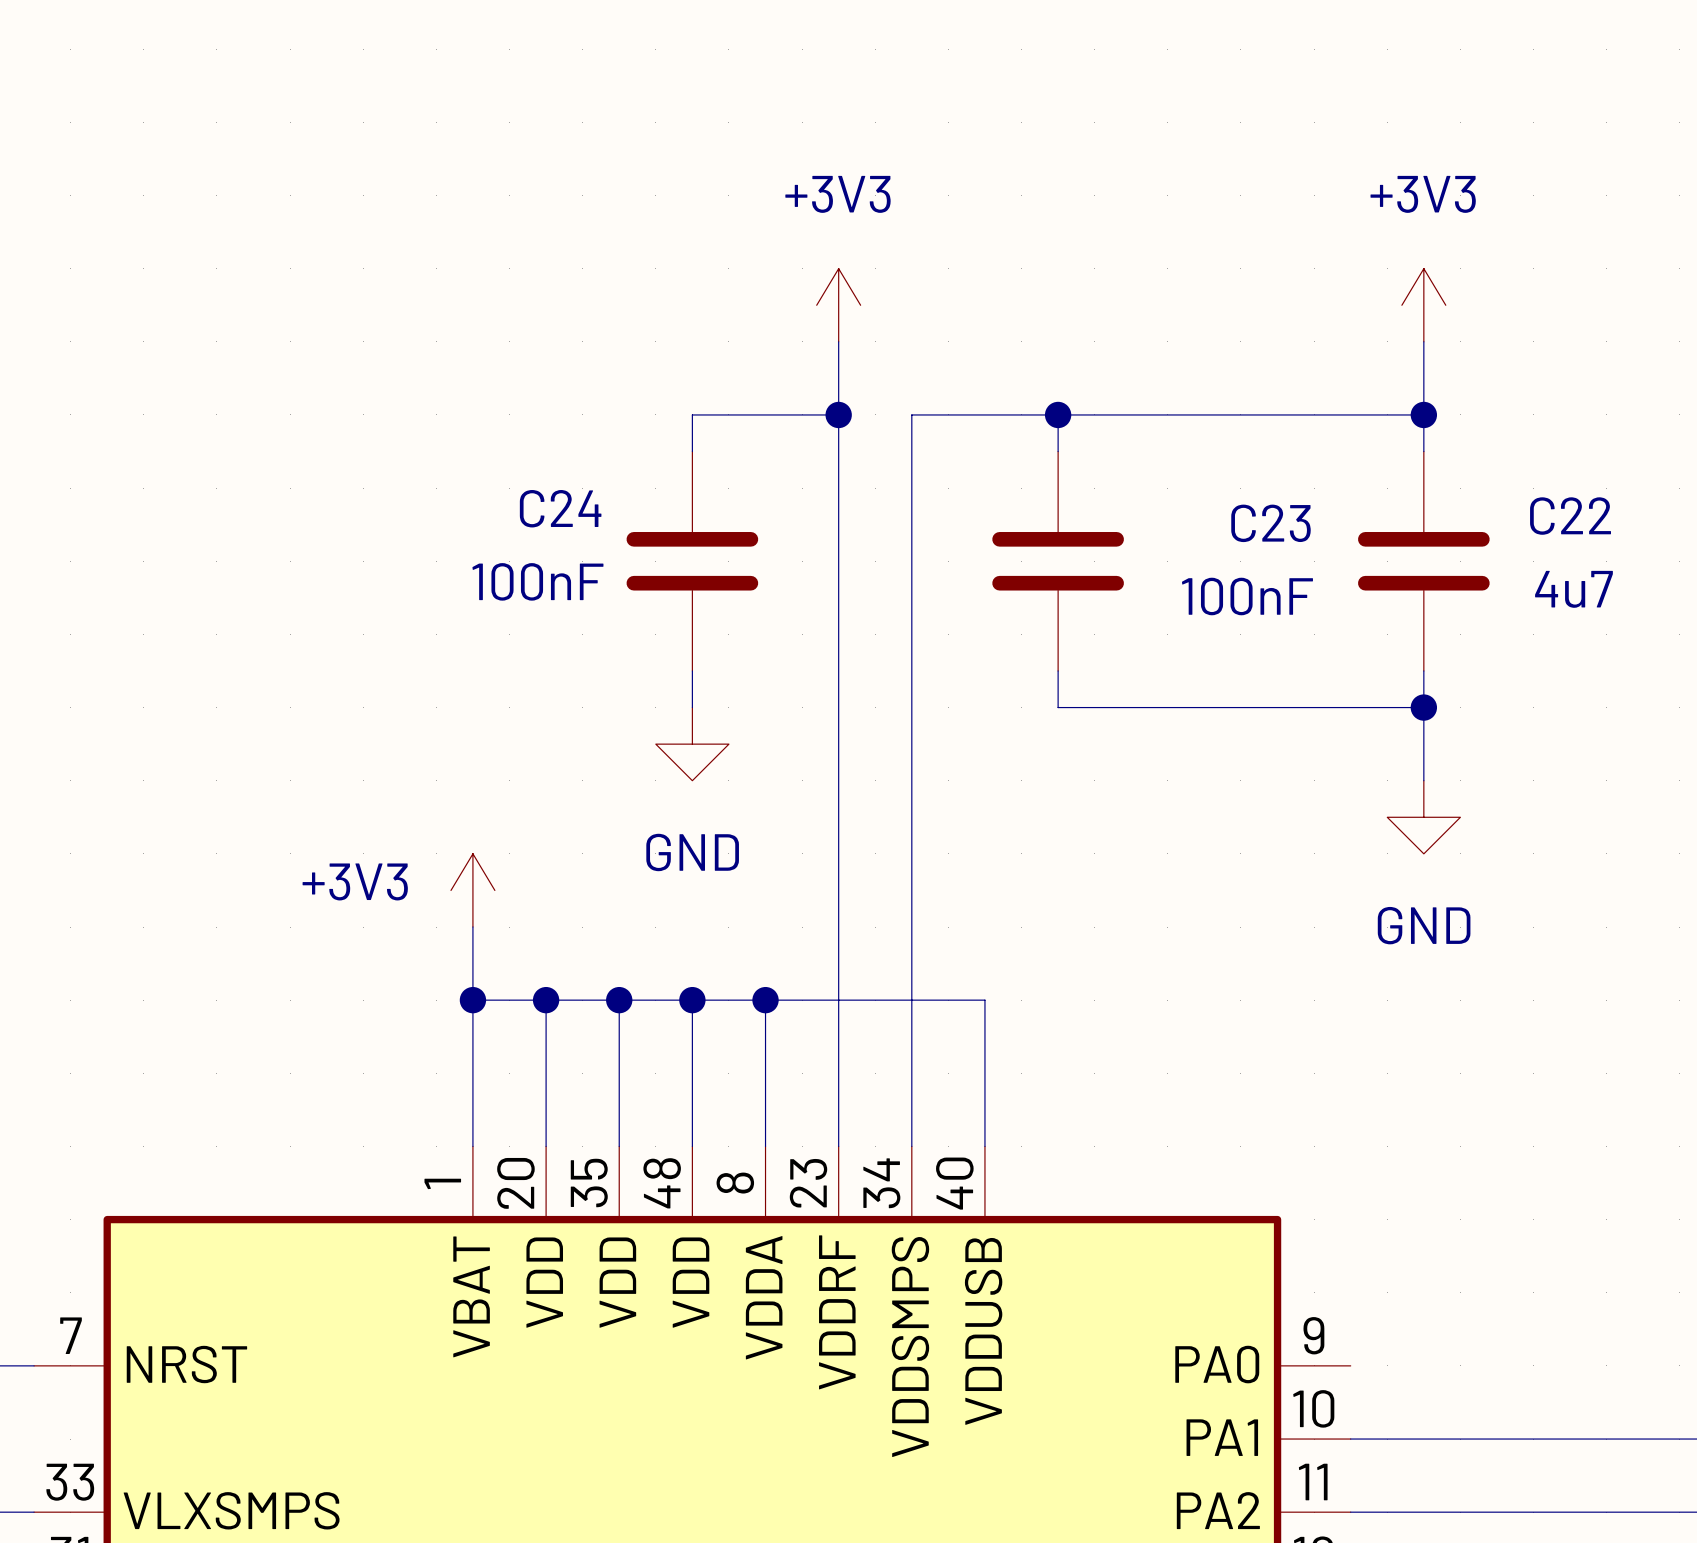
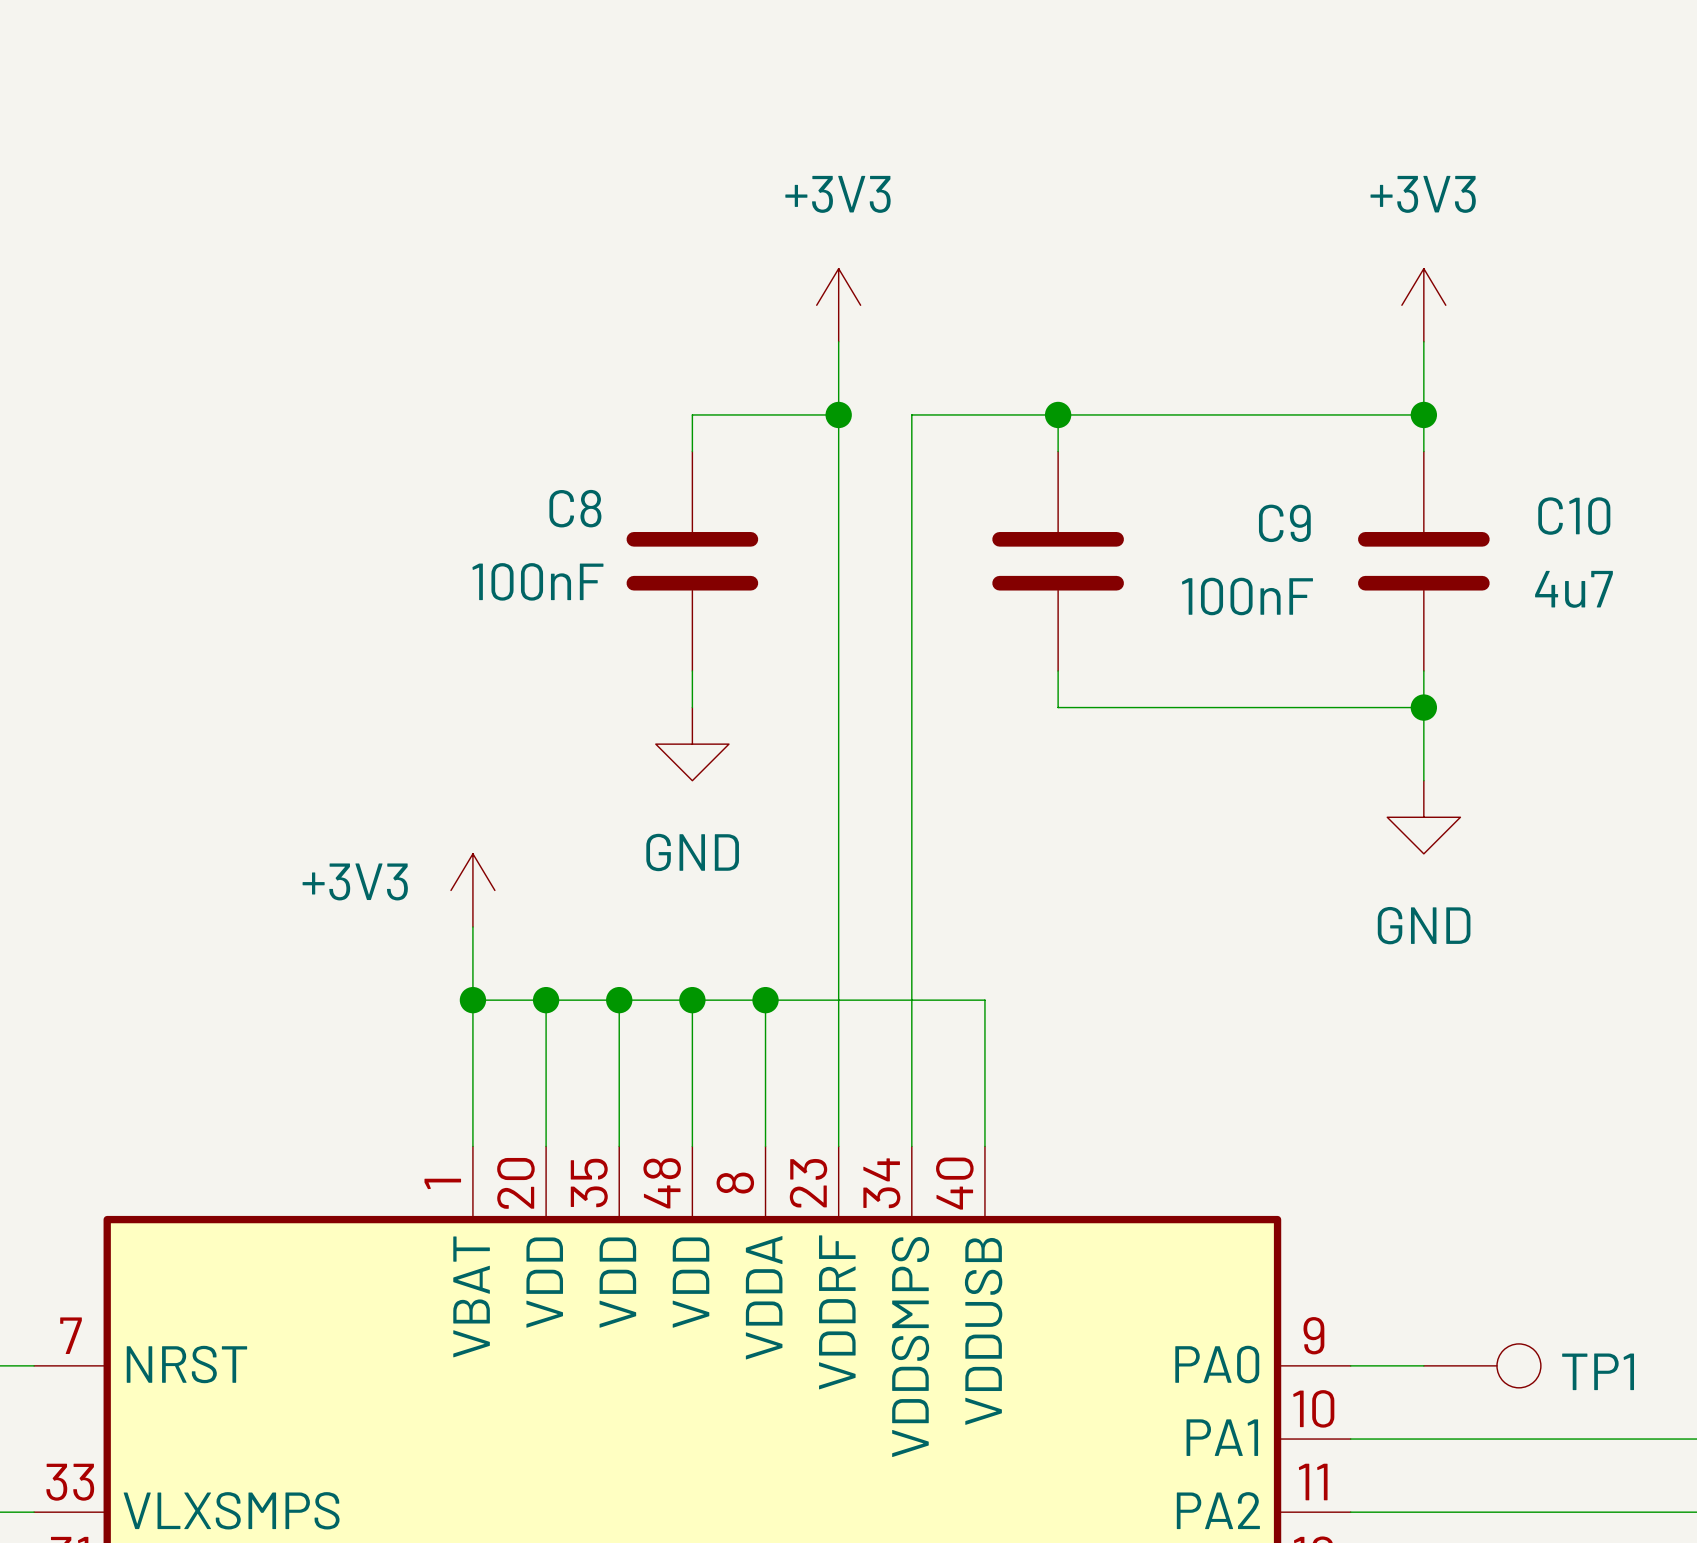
C24 name: C24 (560, 508) -> C8 (575, 508)
C22 name: C22 (1570, 516) -> C10 (1574, 516)
C23 name: C23 (1270, 523) -> C9 (1284, 523)
wire: none -> (1350, 1365) (1423, 1365)
TP1: none -> (1482, 1365)

